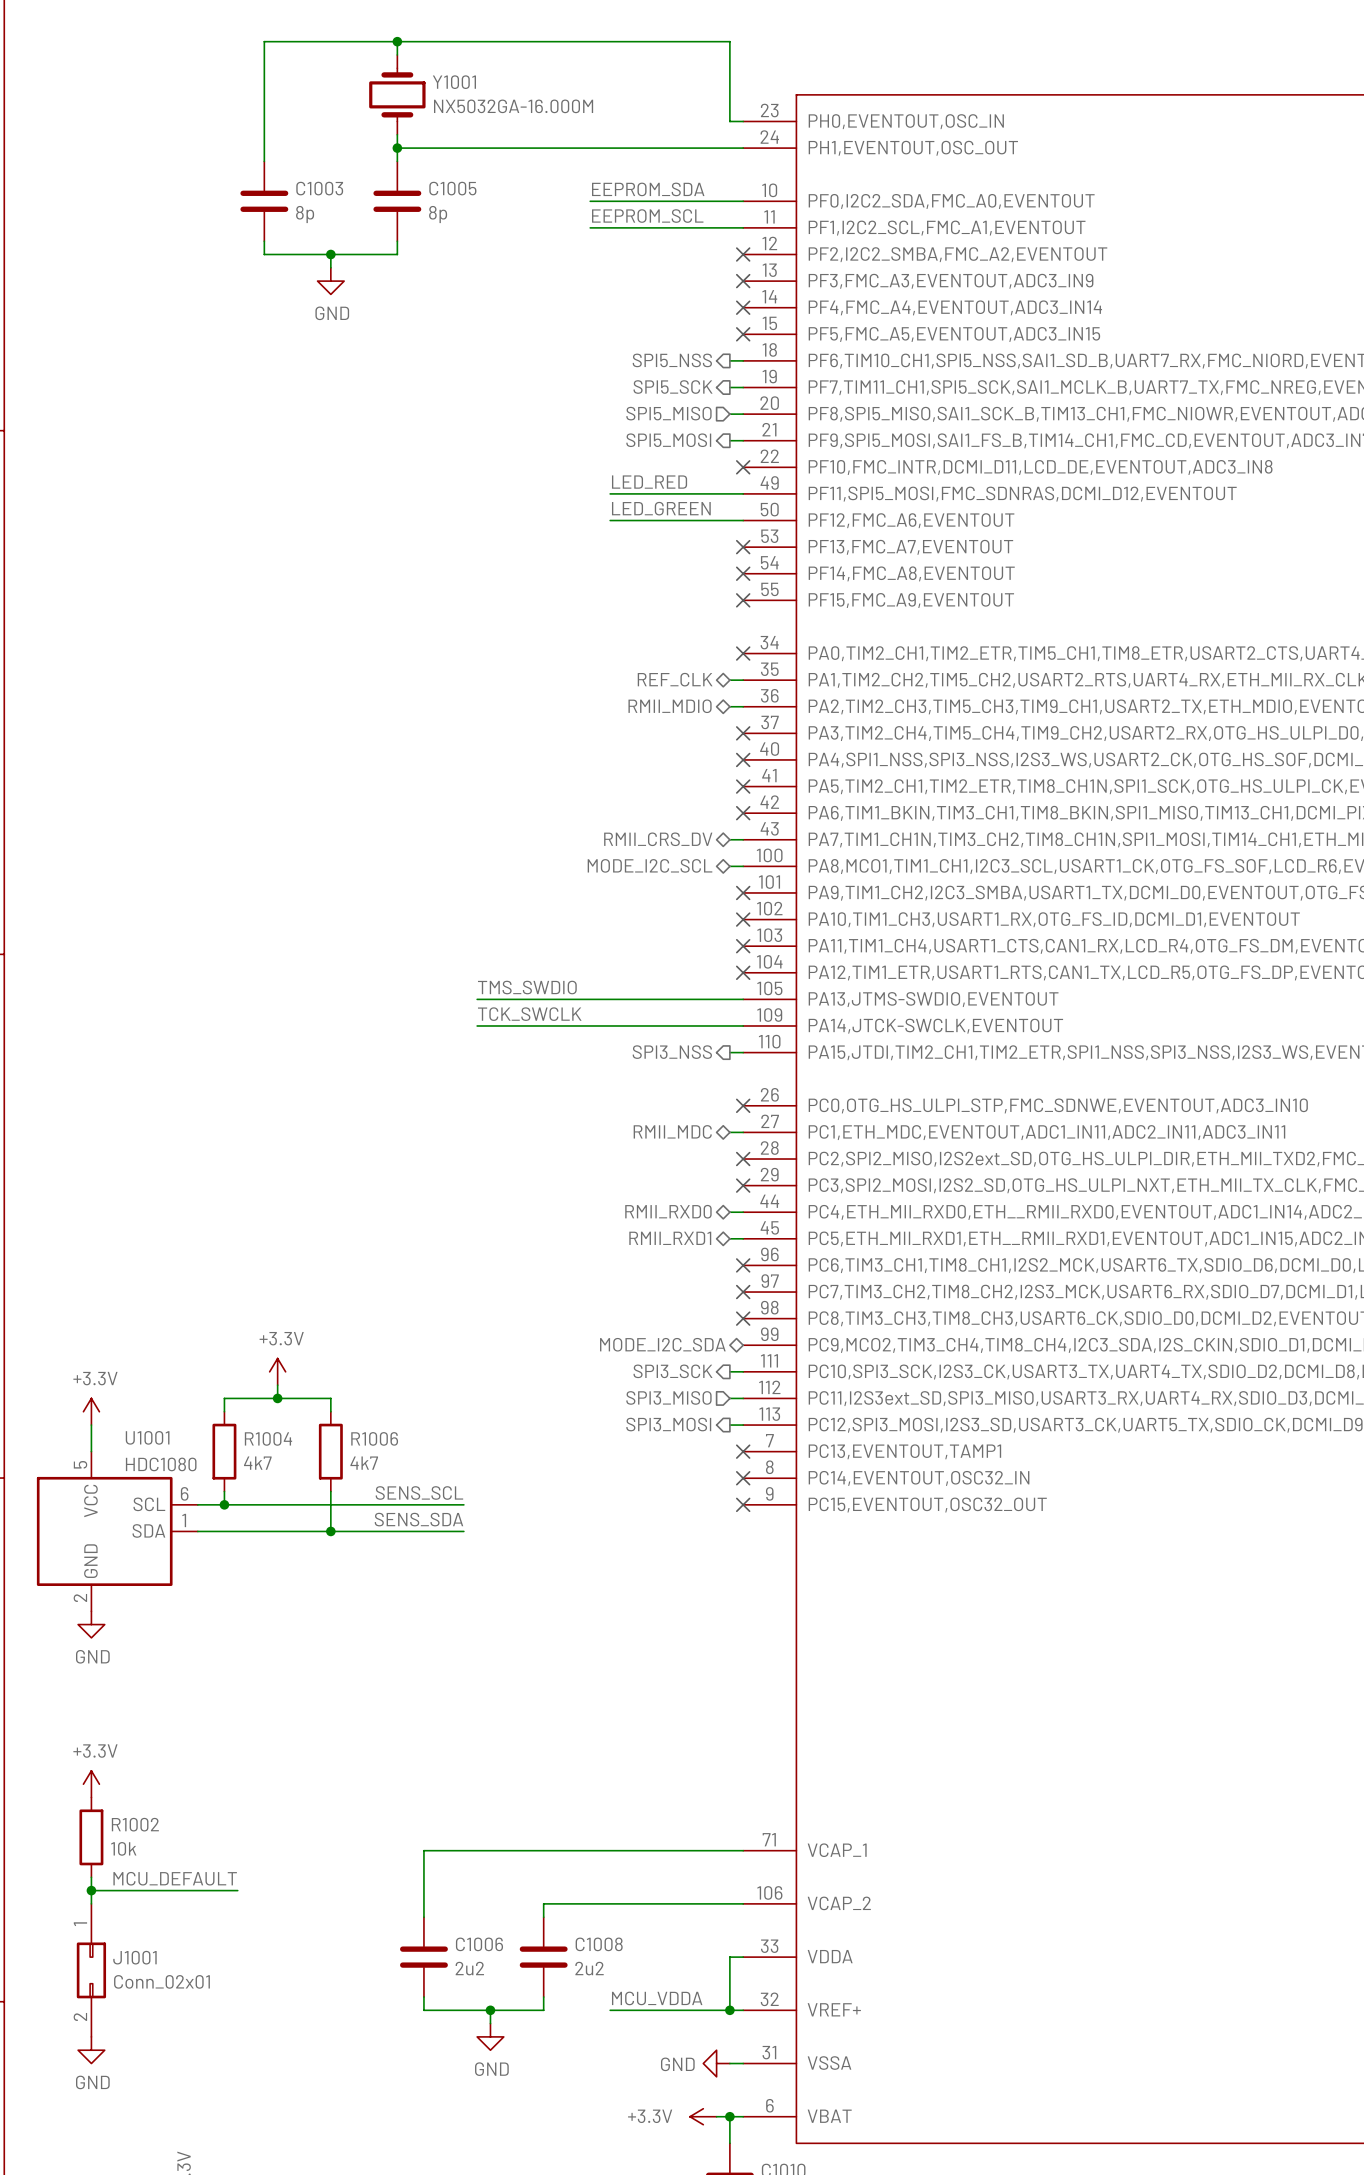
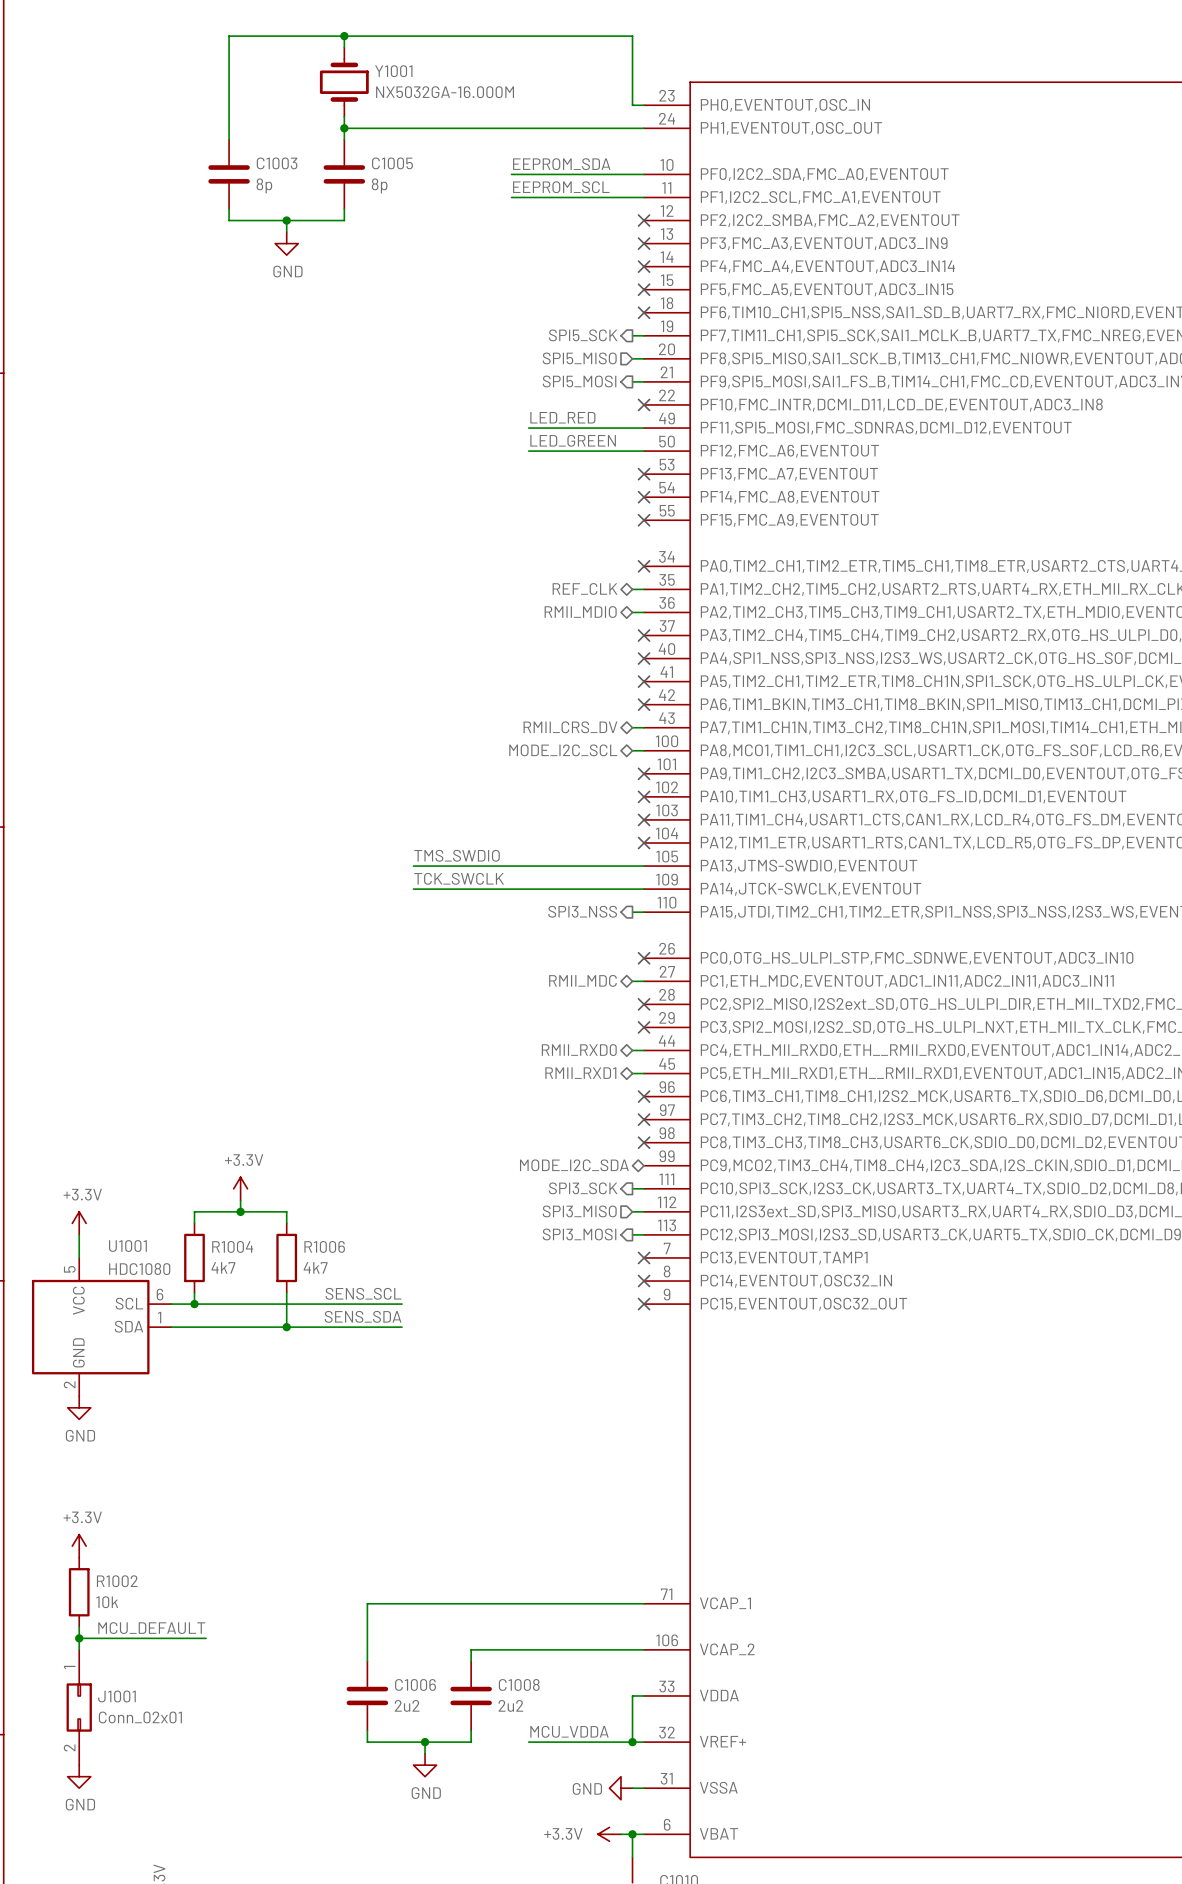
hierarchical label: SPI5_NSS (672, 360) -> none
wire: (729, 360) (743, 360) -> none
no-connect mark: none -> (644, 312)

